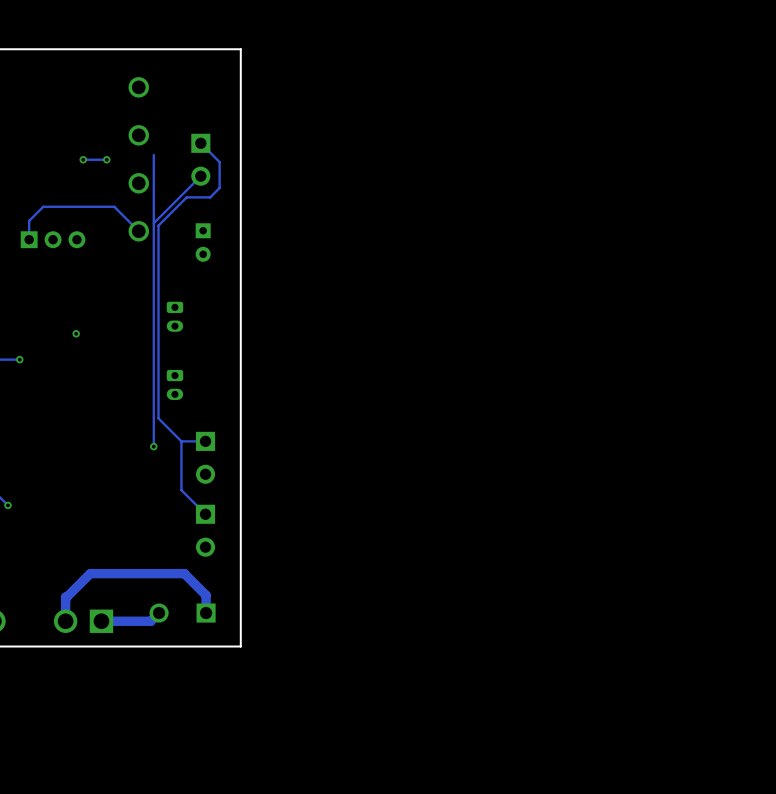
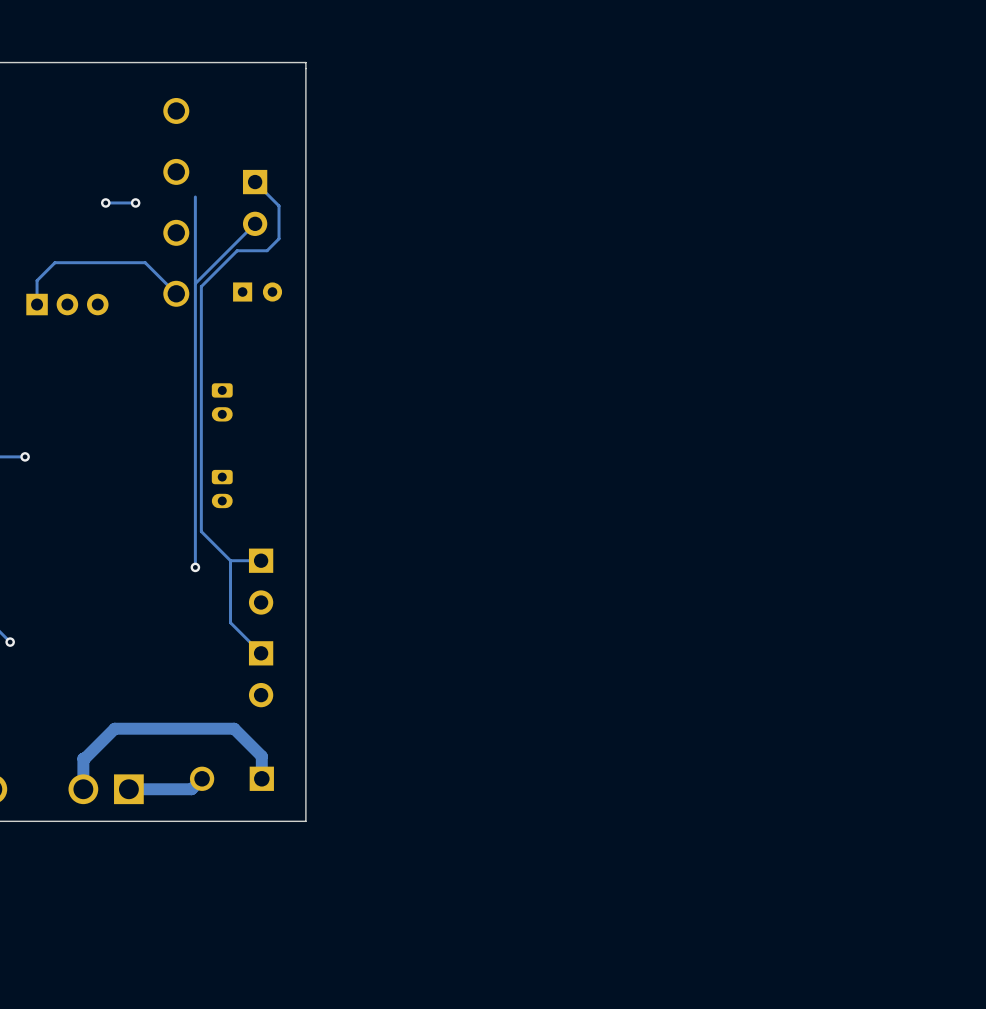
part rotation: 0° (203, 242) -> 90° counterclockwise (257, 291)
via: (76, 333) -> none

